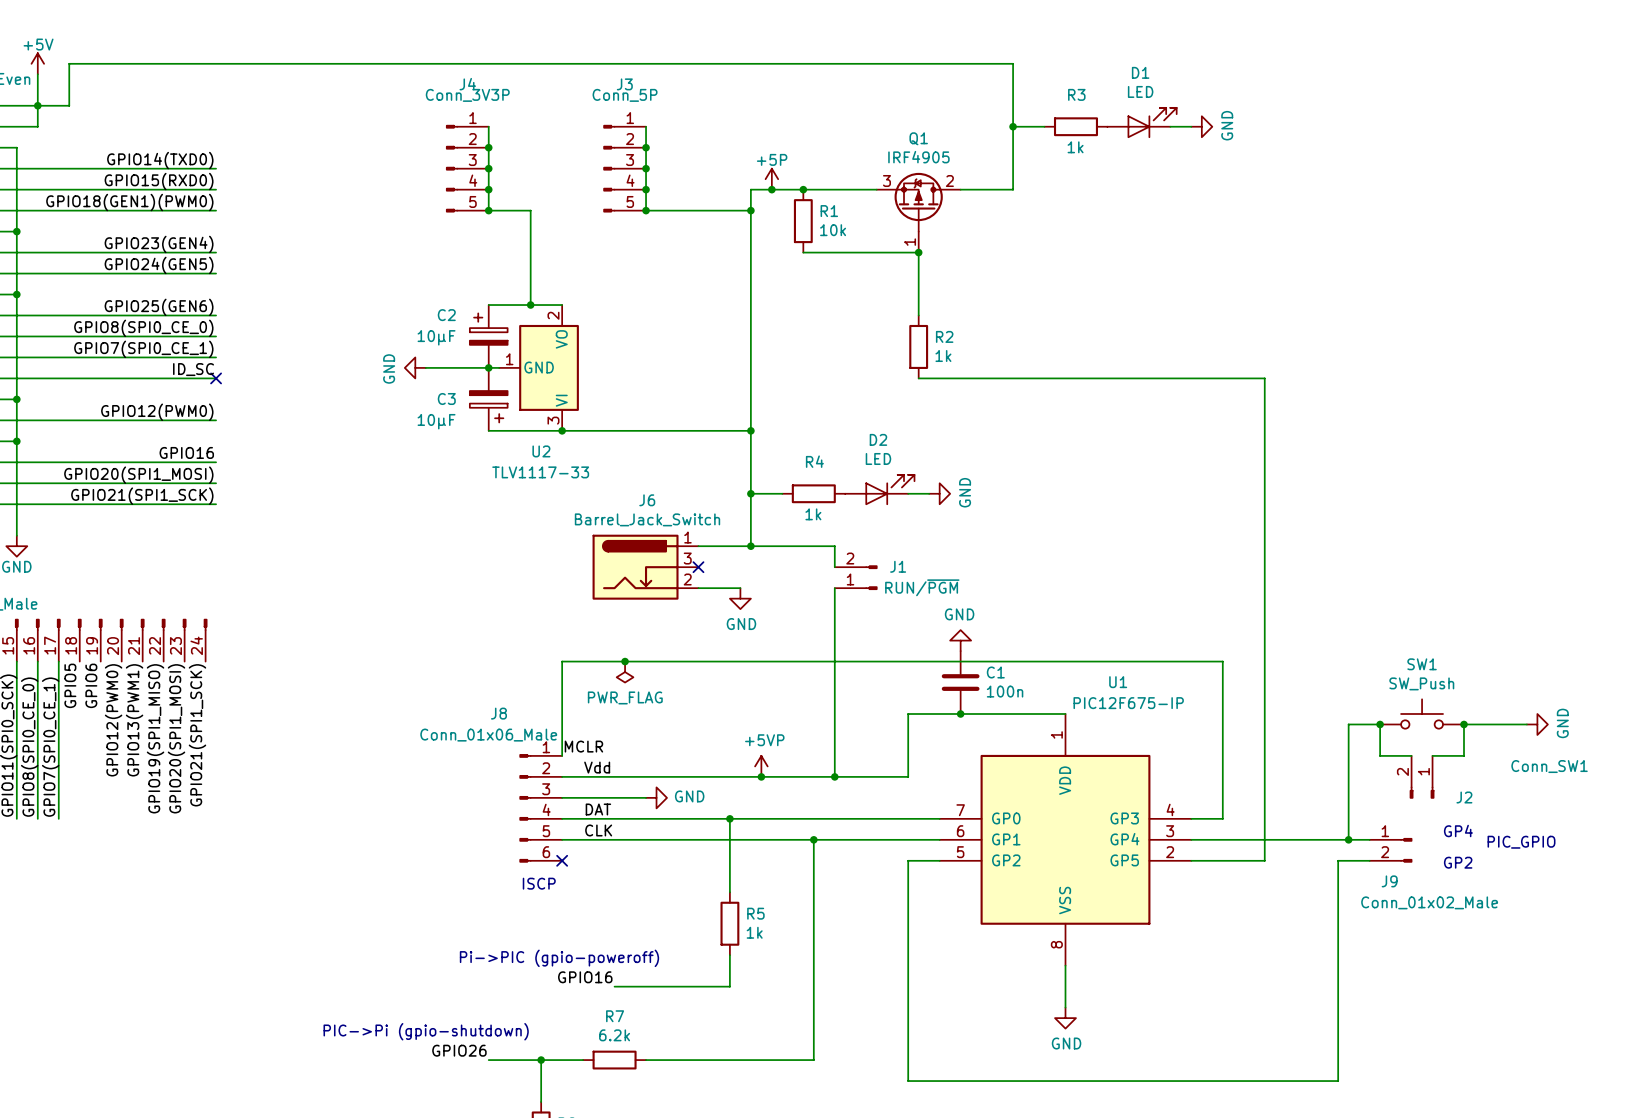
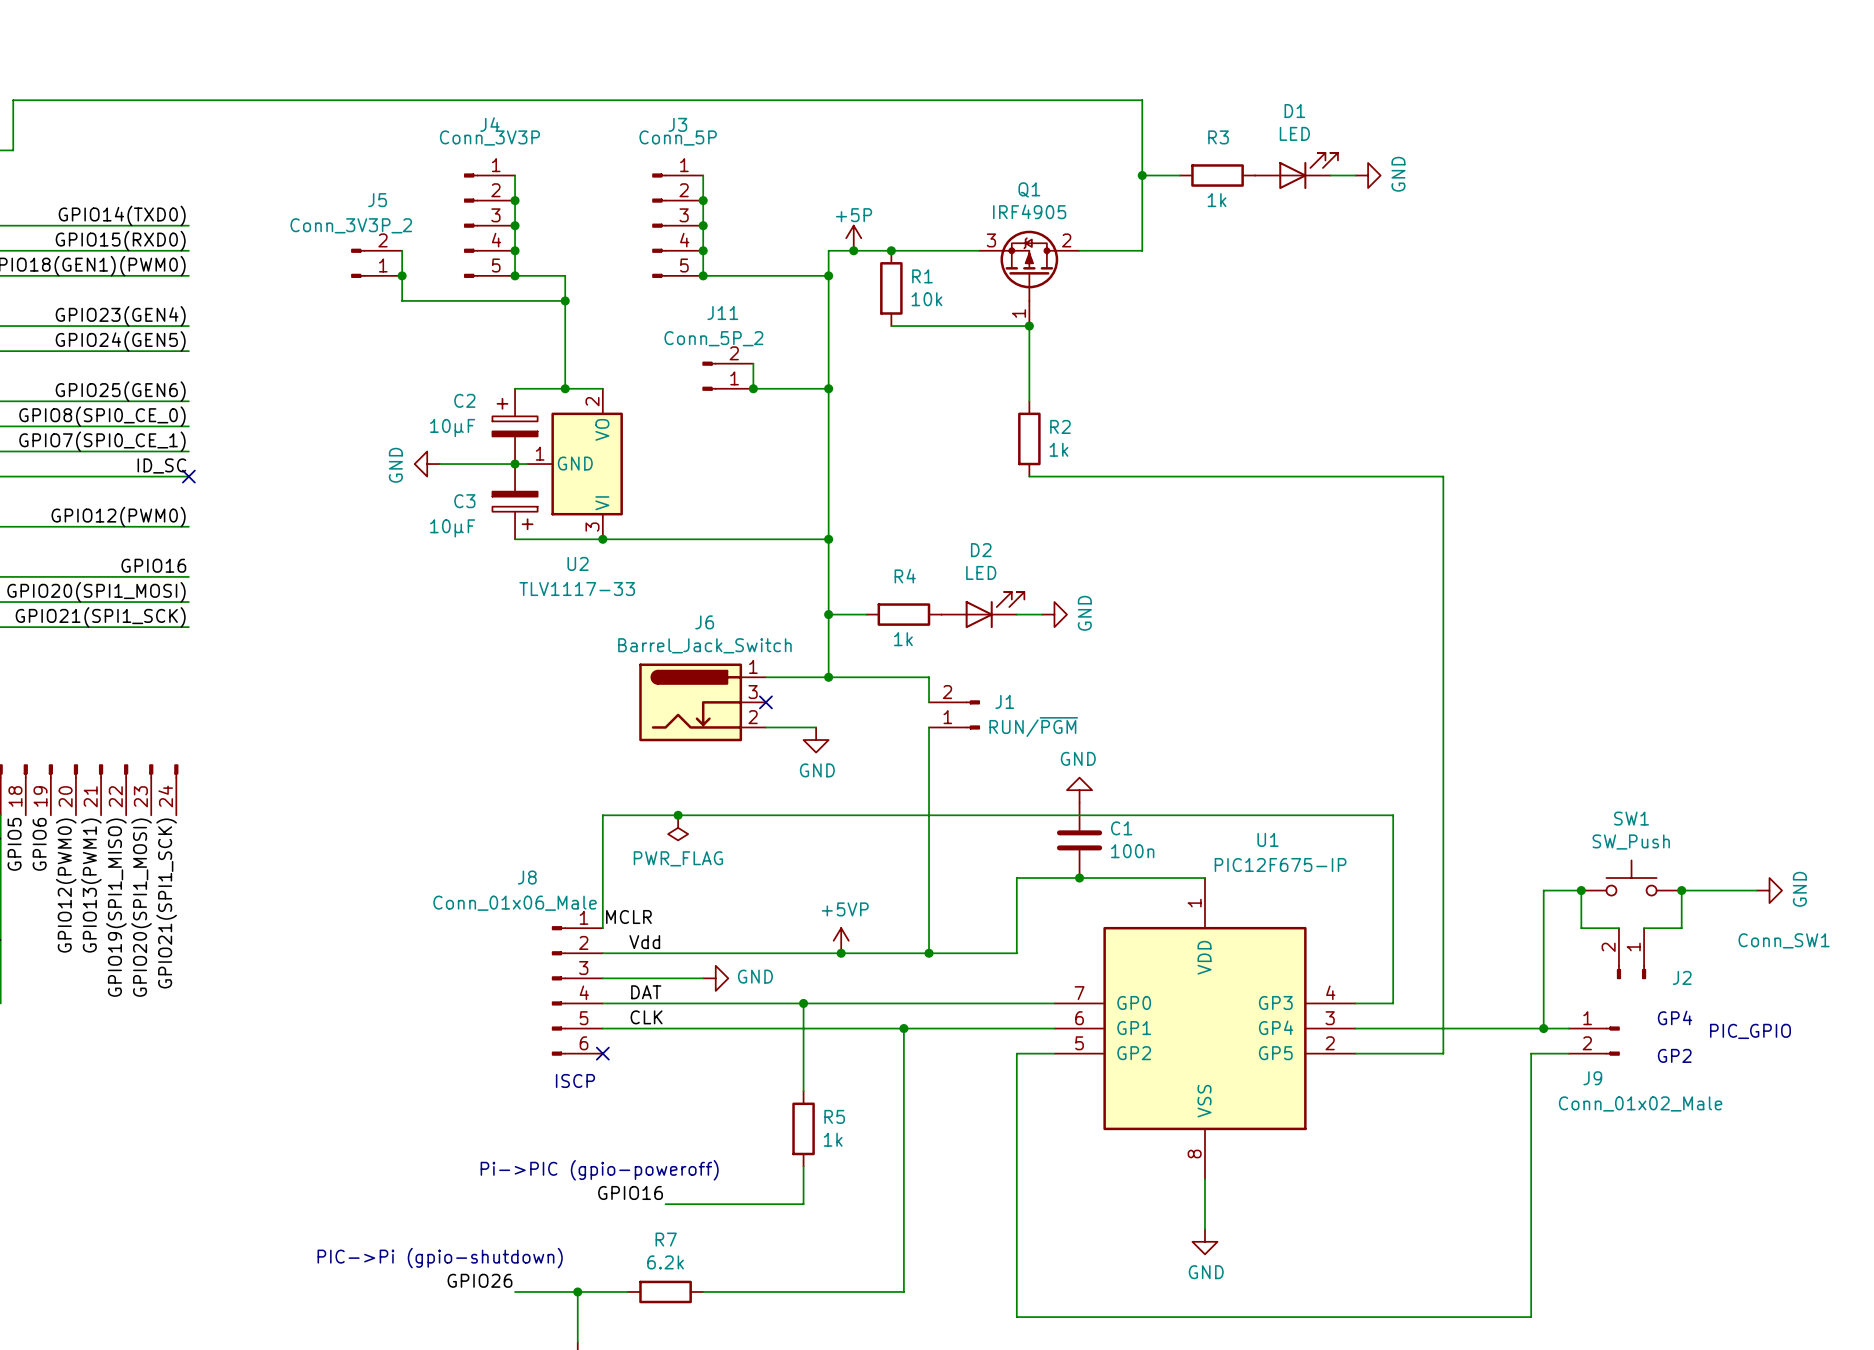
wire: none -> (402, 250) (402, 300) (565, 300)
J5: none -> Conn_3V3P_2 (376, 263)
junction: none -> (402, 275)
junction: none -> (565, 300)
wire: none -> (753, 363) (753, 388) (828, 388)
J11: none -> Conn_5P_2 (727, 376)
junction: none -> (753, 388)
junction: none -> (828, 388)

